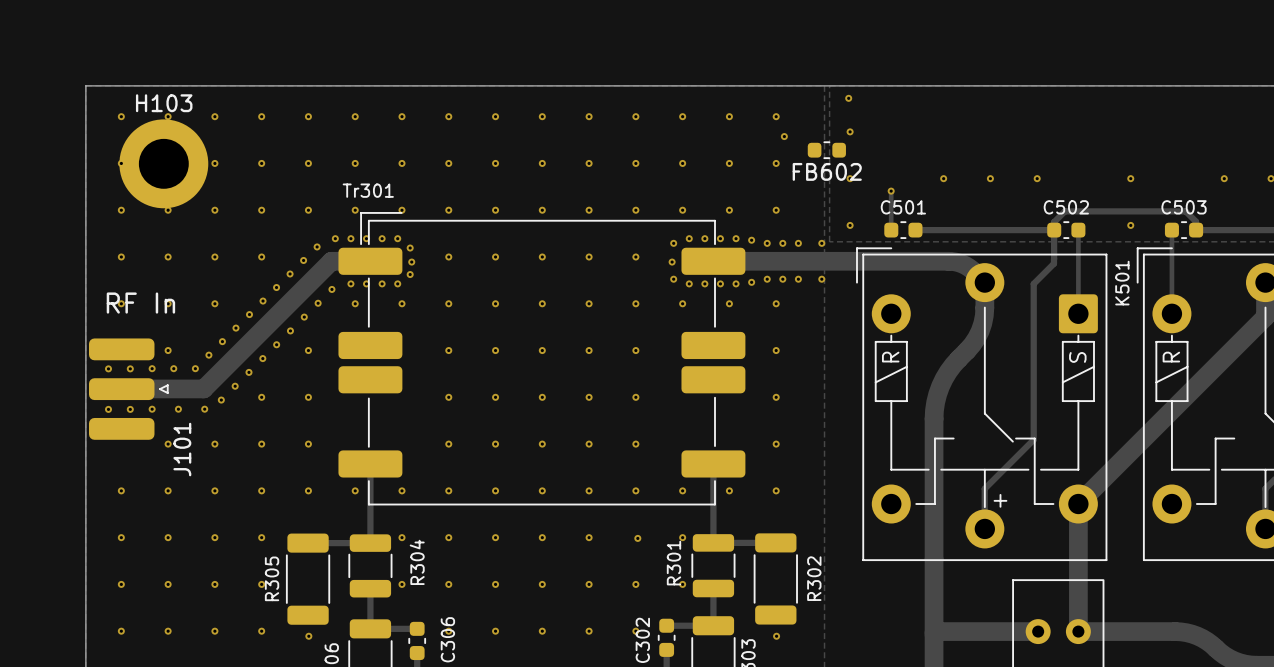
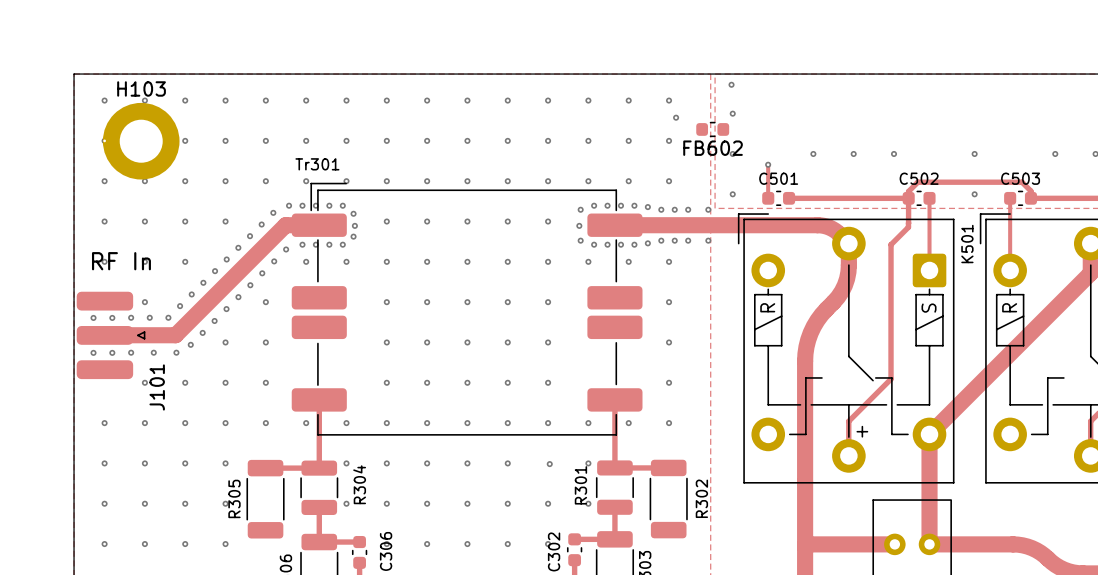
via: (308, 636) -> none
via: (776, 636) -> none

